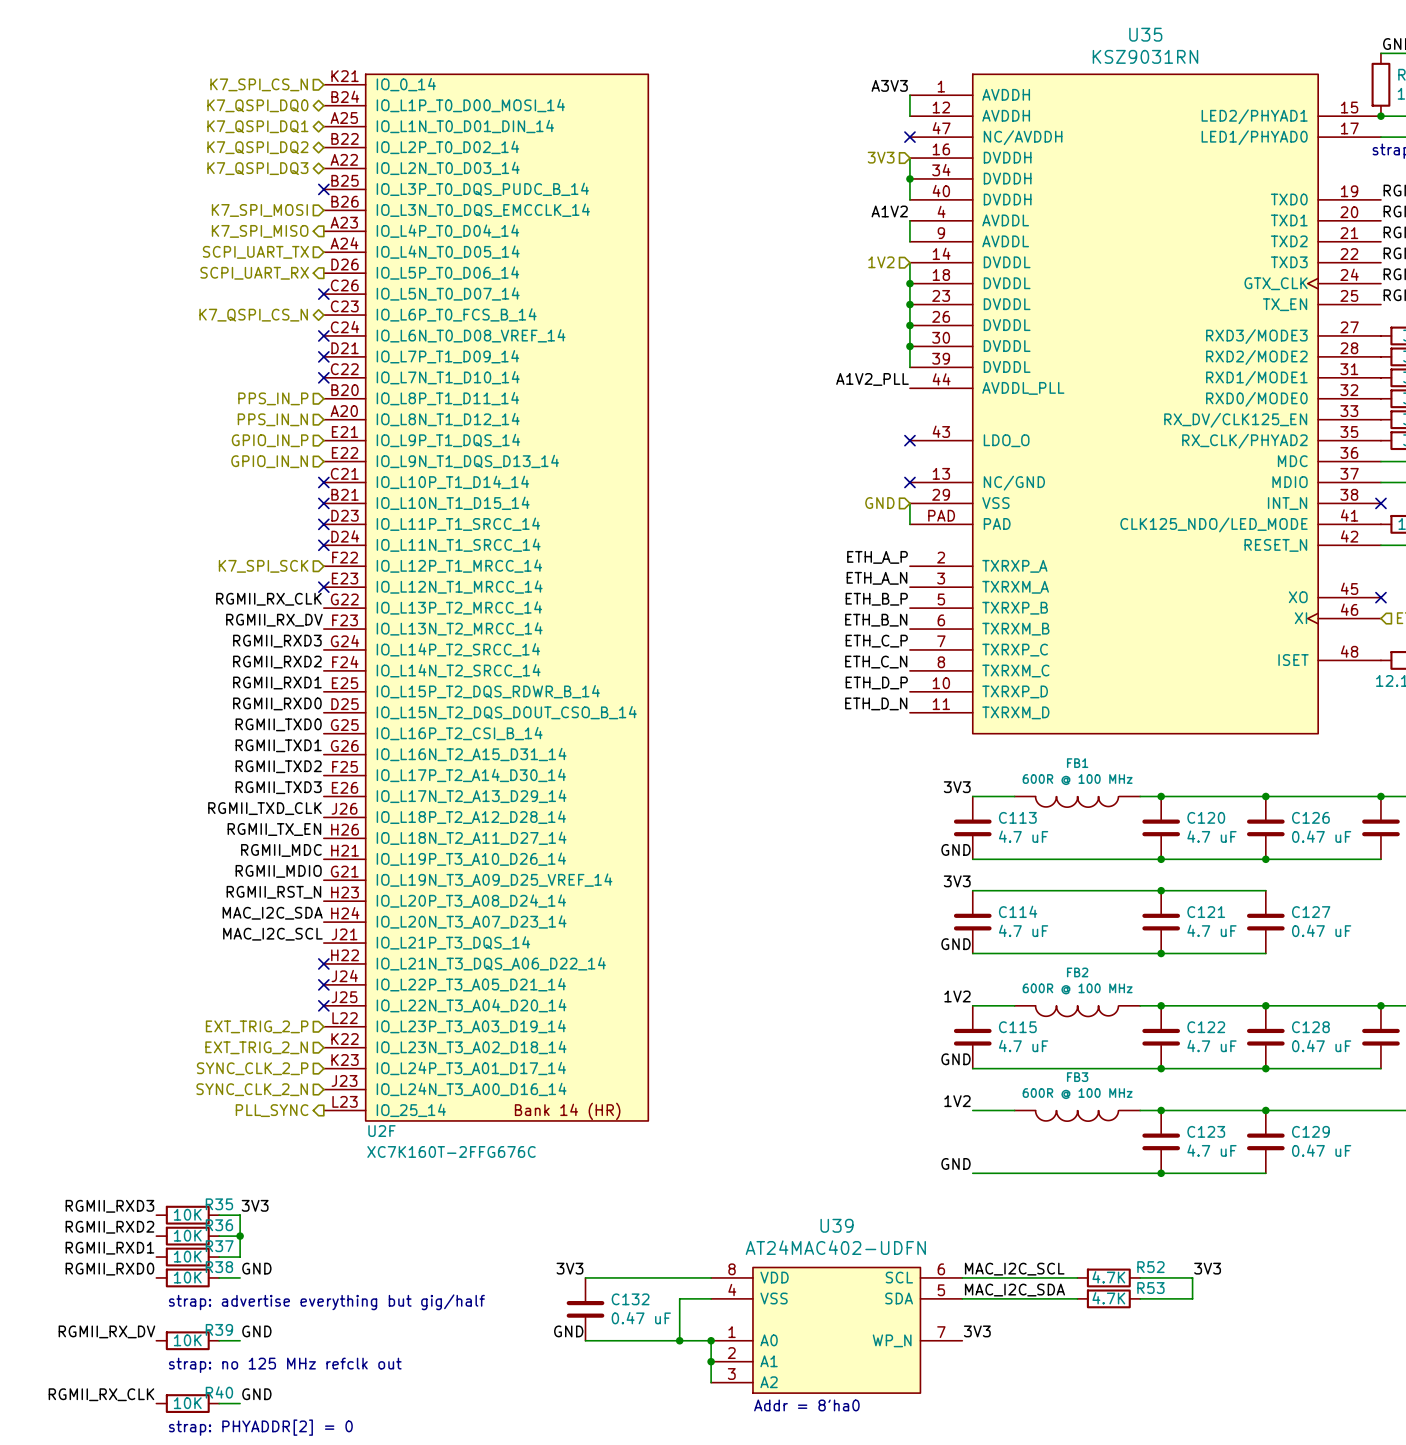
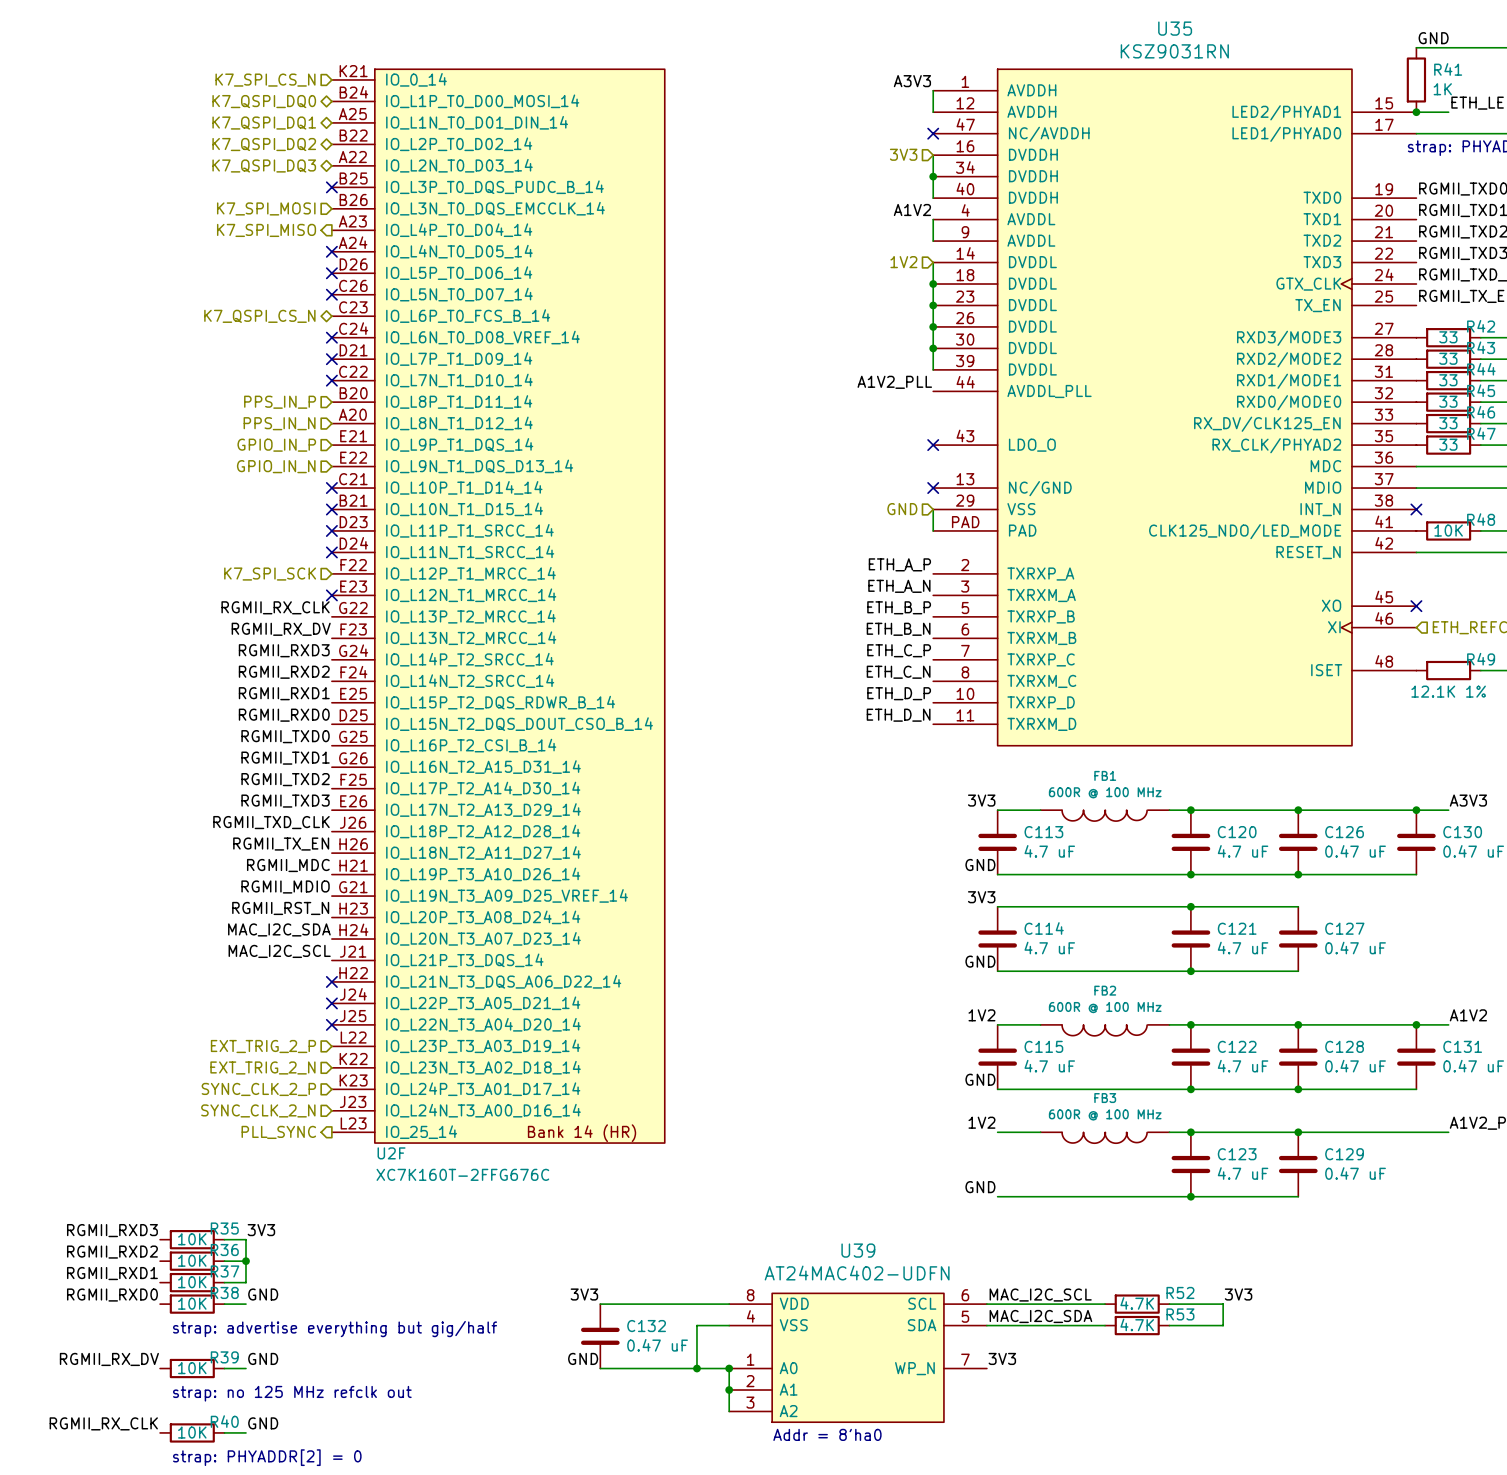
hierarchical label: SCPI_UART_TX (255, 252) -> none
no-connect mark: none -> (331, 251)
hierarchical label: SCPI_UART_RX (254, 273) -> none
no-connect mark: none -> (331, 273)

